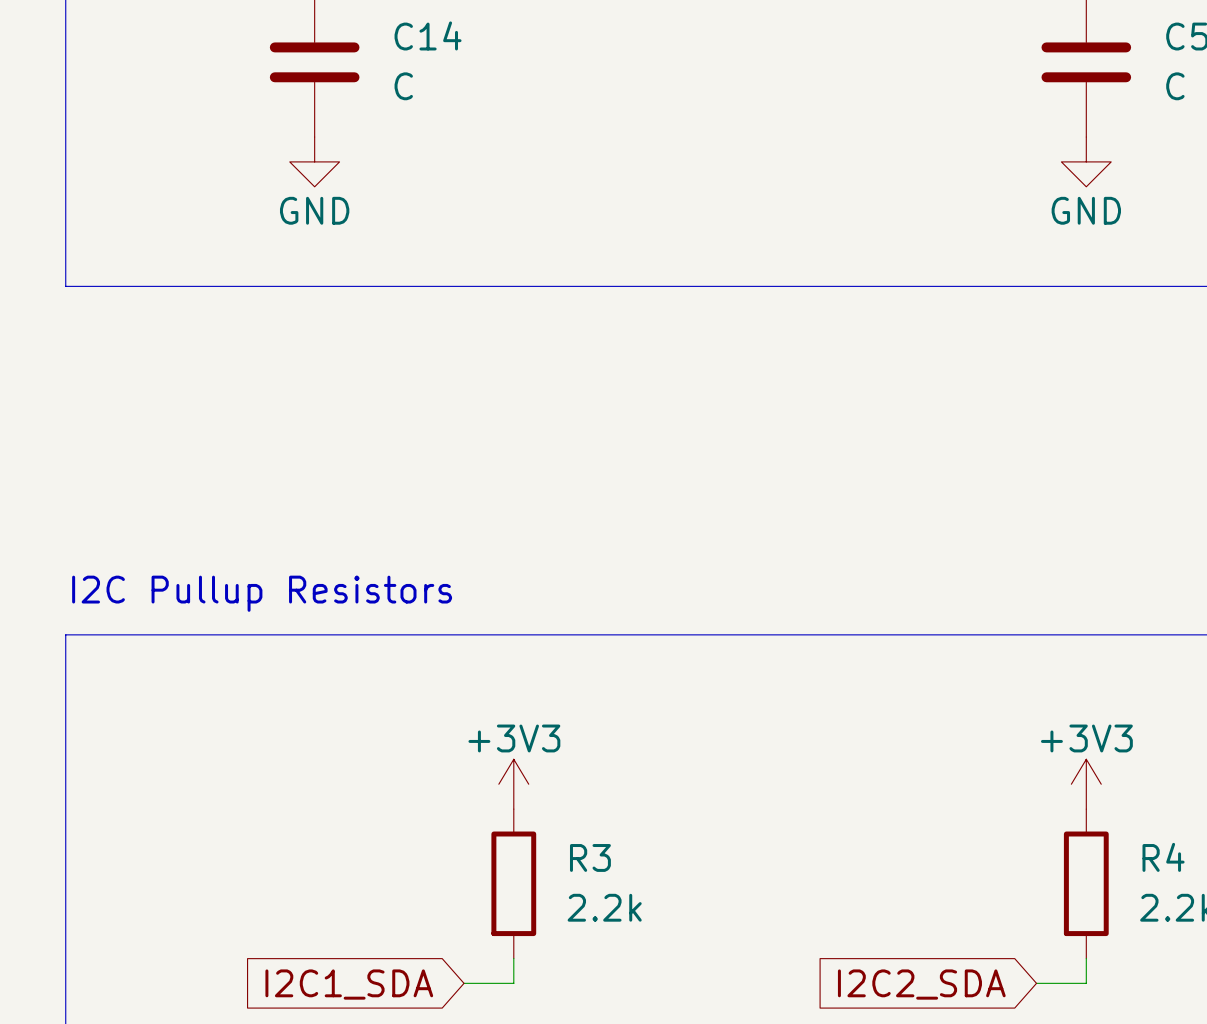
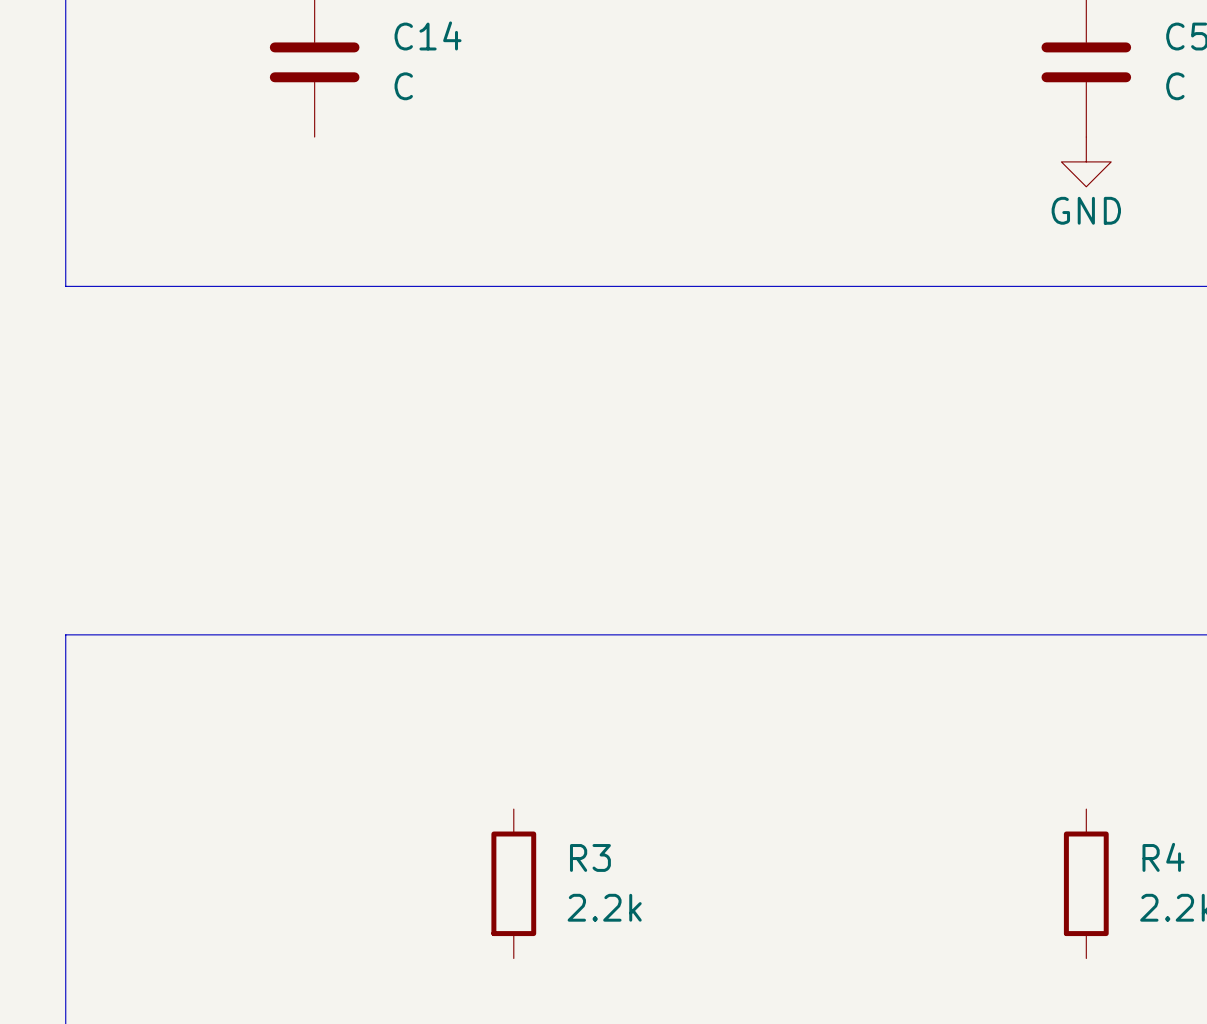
power symbol: GND (314, 161) -> none
text: I2C Pullup Resistors (262, 593) -> none
power symbol: +3V3 (513, 784) -> none
power symbol: +3V3 (1086, 784) -> none
wire: (513, 958) (513, 983) (464, 983) -> none
wire: (1086, 958) (1086, 983) (1036, 983) -> none
global label: I2C1_SDA (349, 984) -> none
global label: I2C2_SDA (921, 984) -> none

